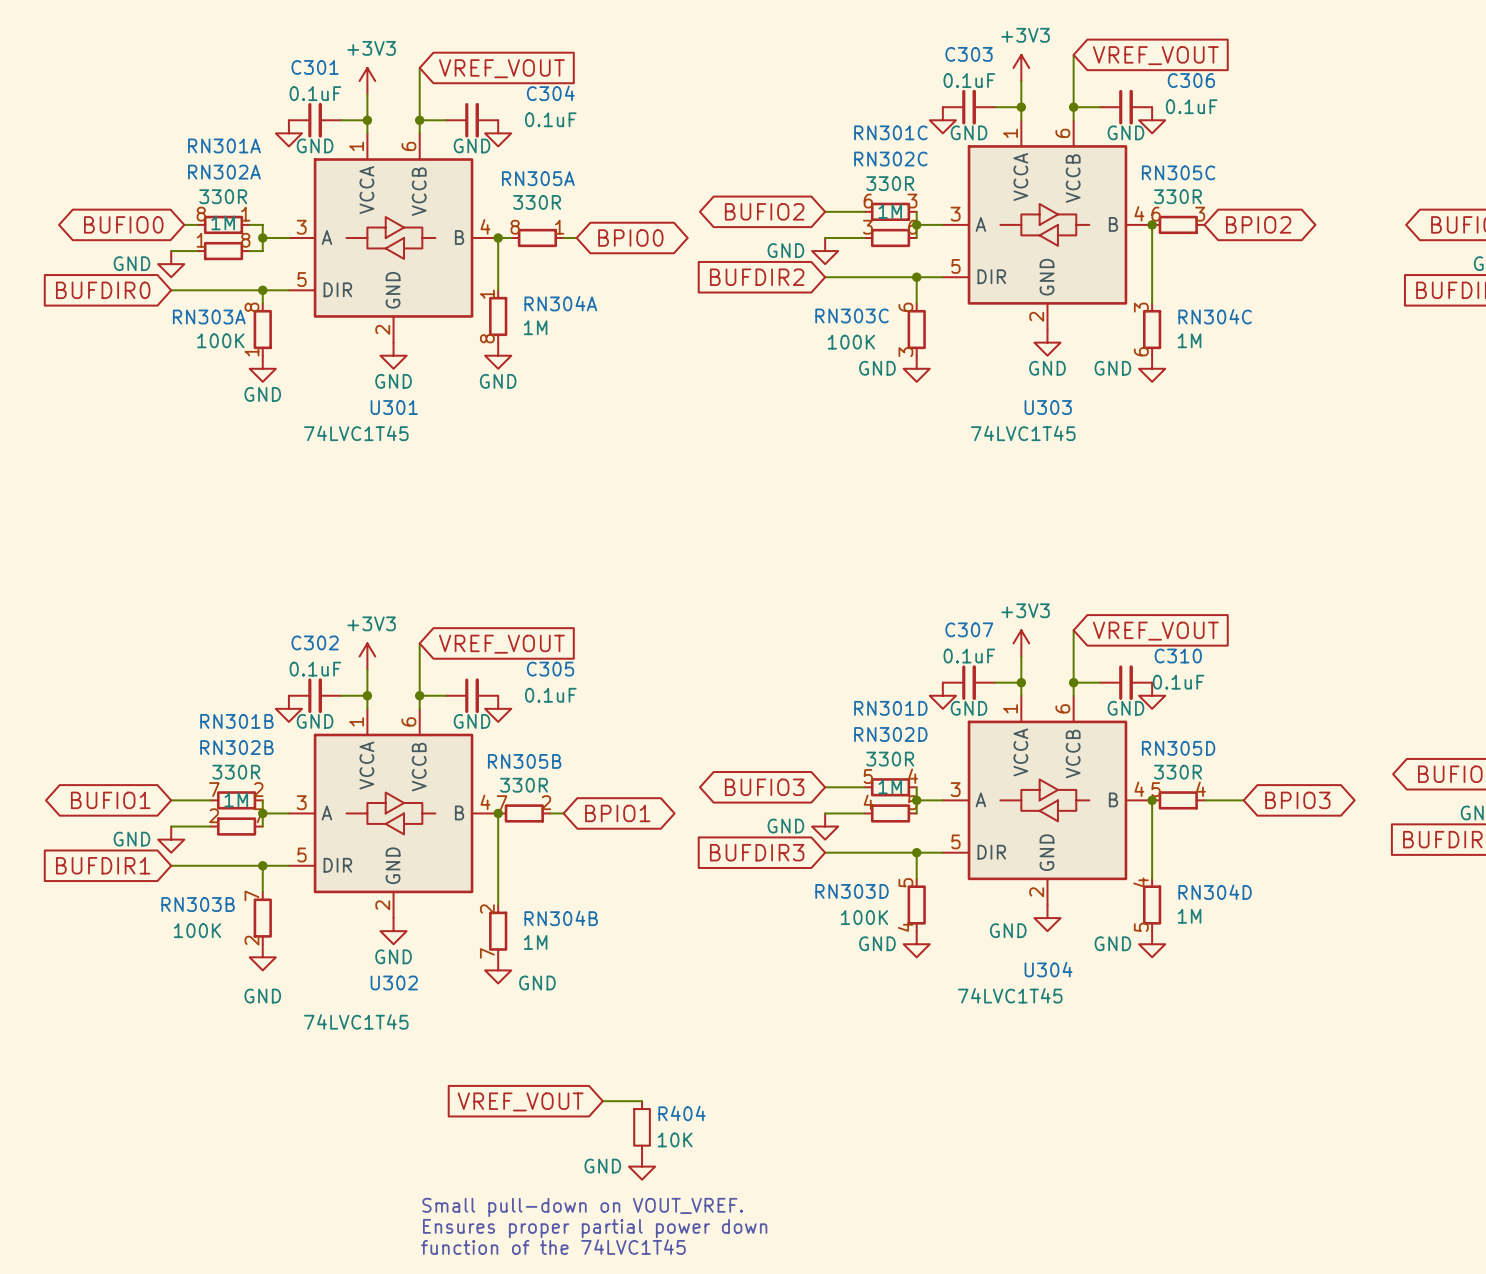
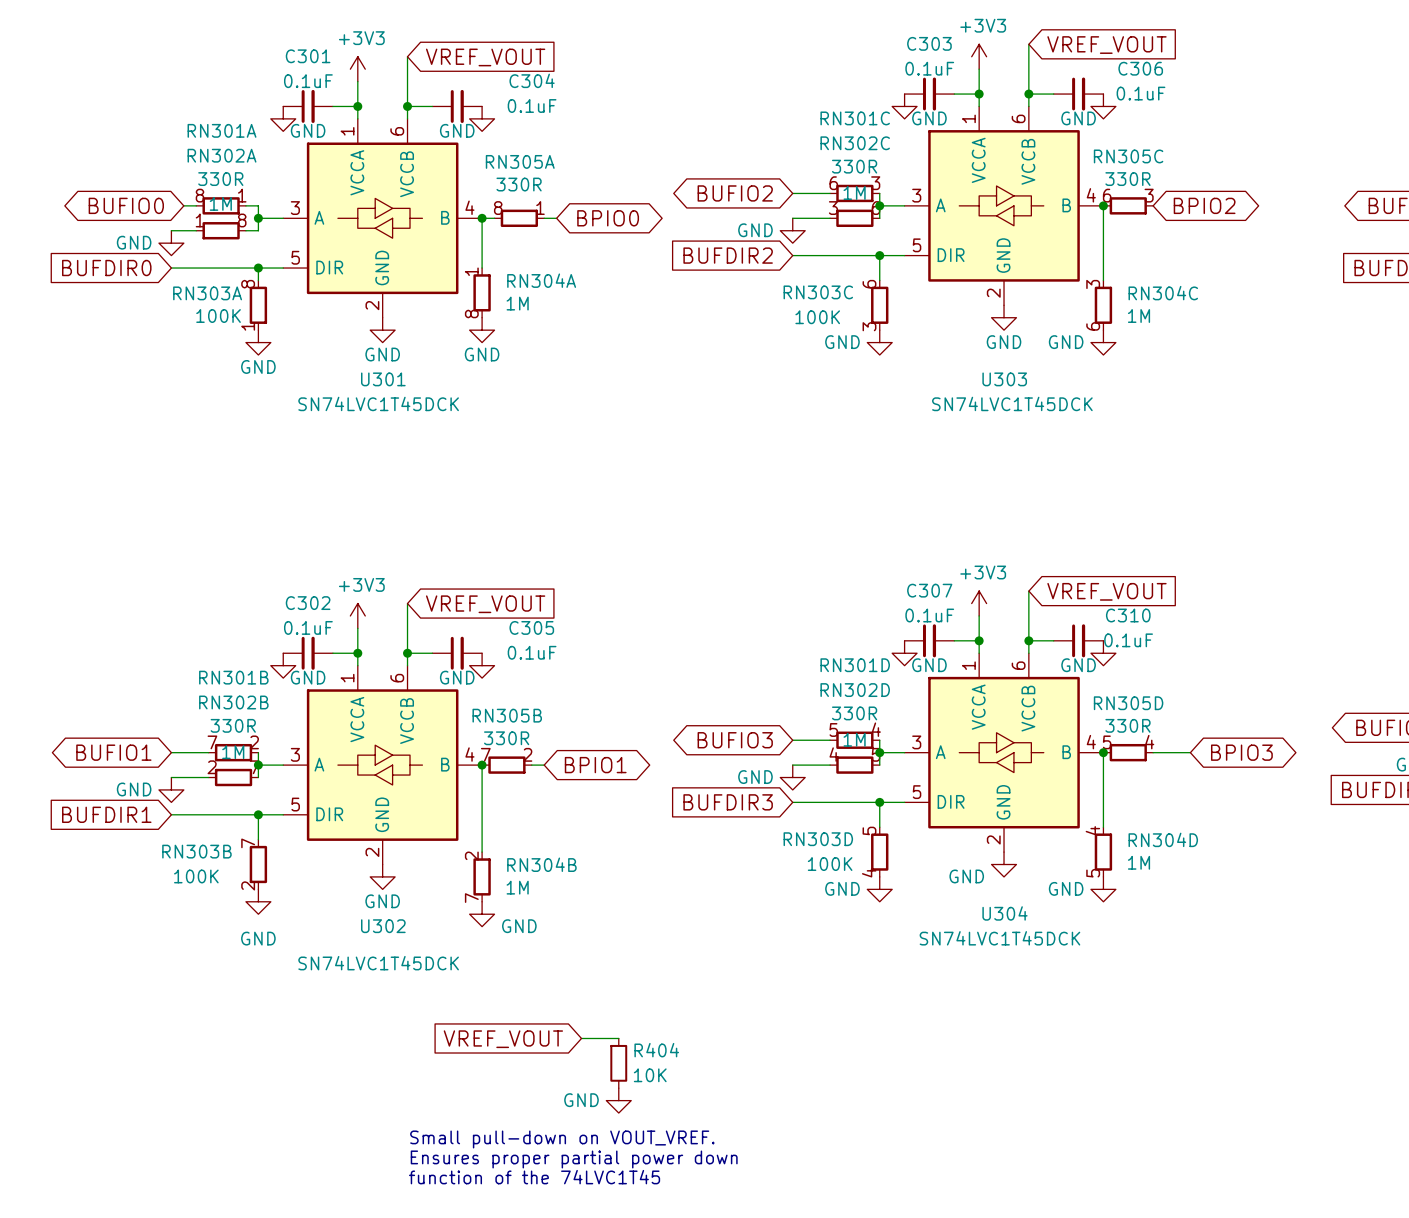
U301 value: 74LVC1T45 (356, 433) -> SN74LVC1T45DCK (378, 403)
U303 value: 74LVC1T45 (1023, 433) -> SN74LVC1T45DCK (1012, 403)
U304 value: 74LVC1T45 (1010, 995) -> SN74LVC1T45DCK (999, 938)
U302 value: 74LVC1T45 (356, 1021) -> SN74LVC1T45DCK (378, 963)

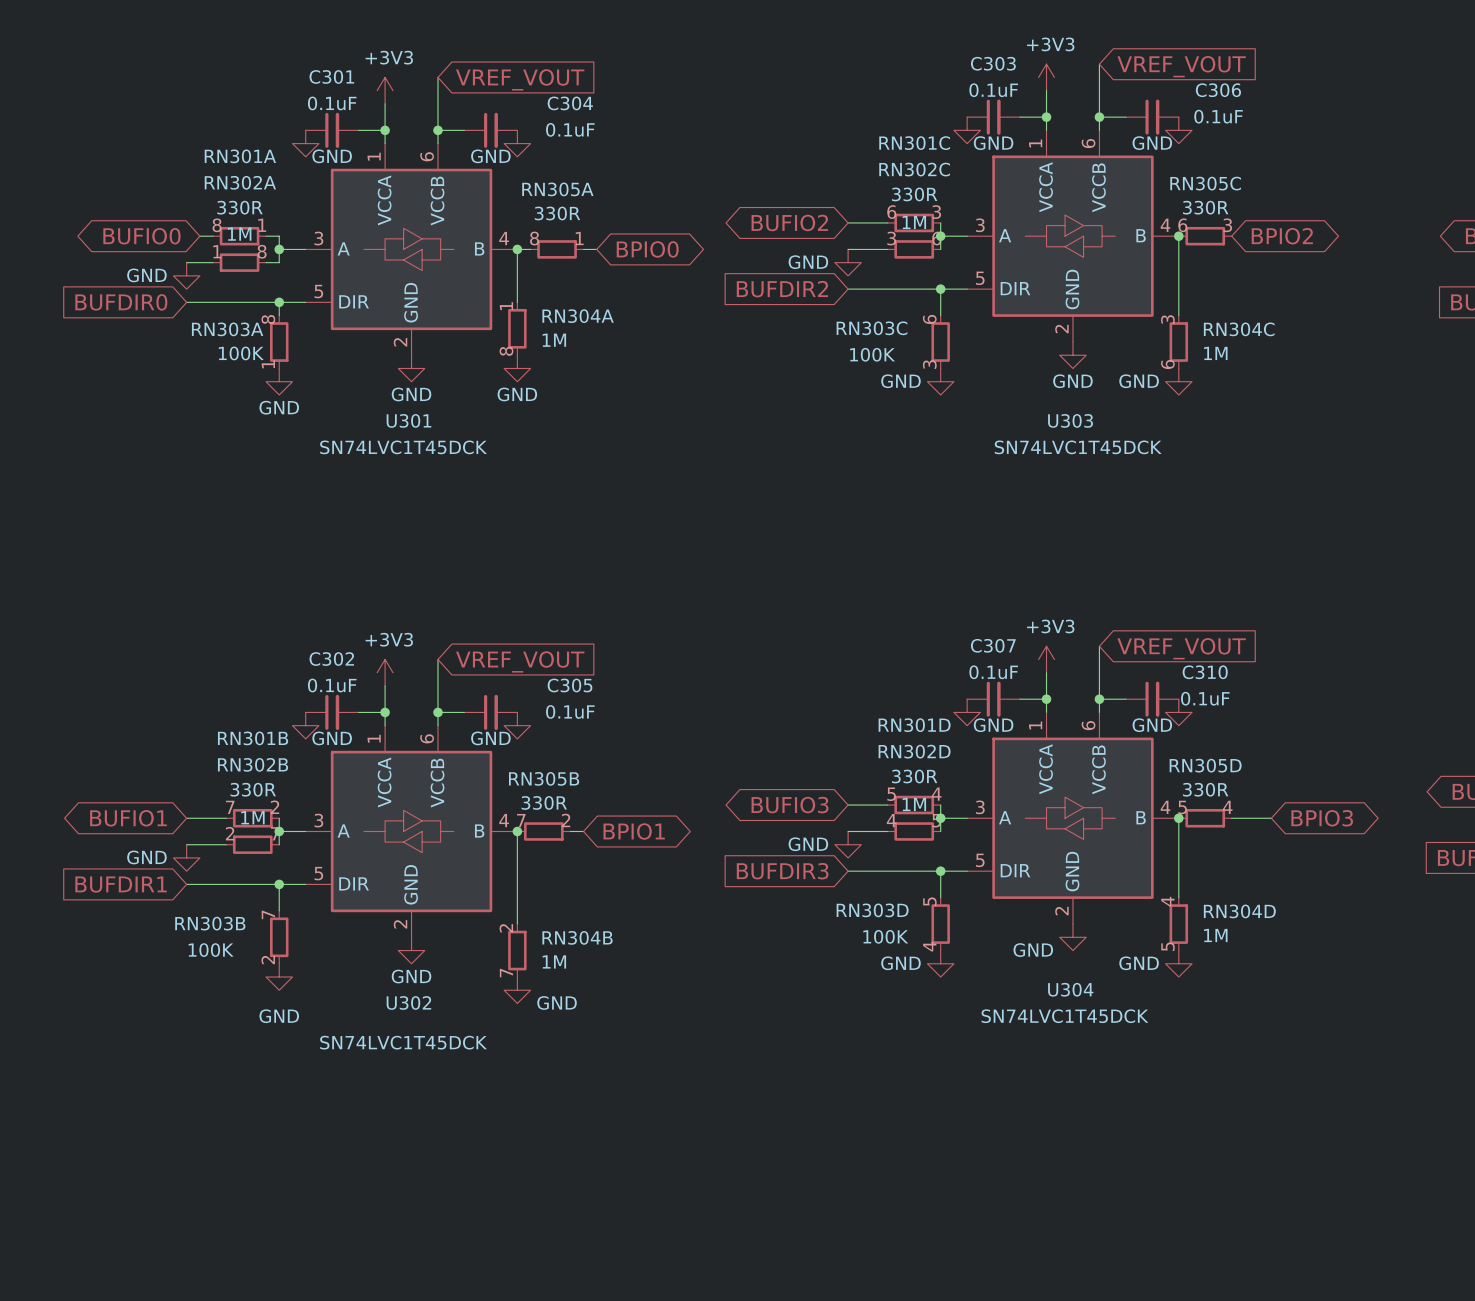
wire: (581, 1038) (618, 1038) -> none
global label: VREF_VOUT (503, 1039) -> none
R404: 10K (618, 1063) -> none
power symbol: GND (618, 1100) -> none
text: Small pull-down on VOUT_VREF. (562, 1139) -> none
text: Ensures proper partial power down (574, 1159) -> none
text: function of the 74LVC1T45 (534, 1177) -> none

